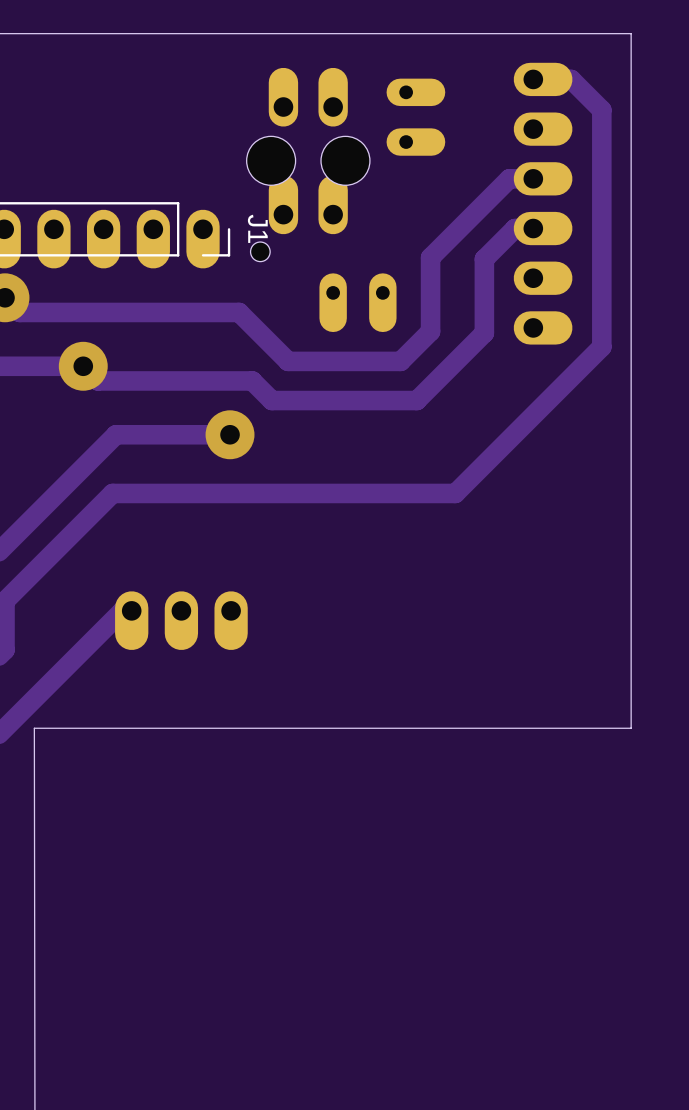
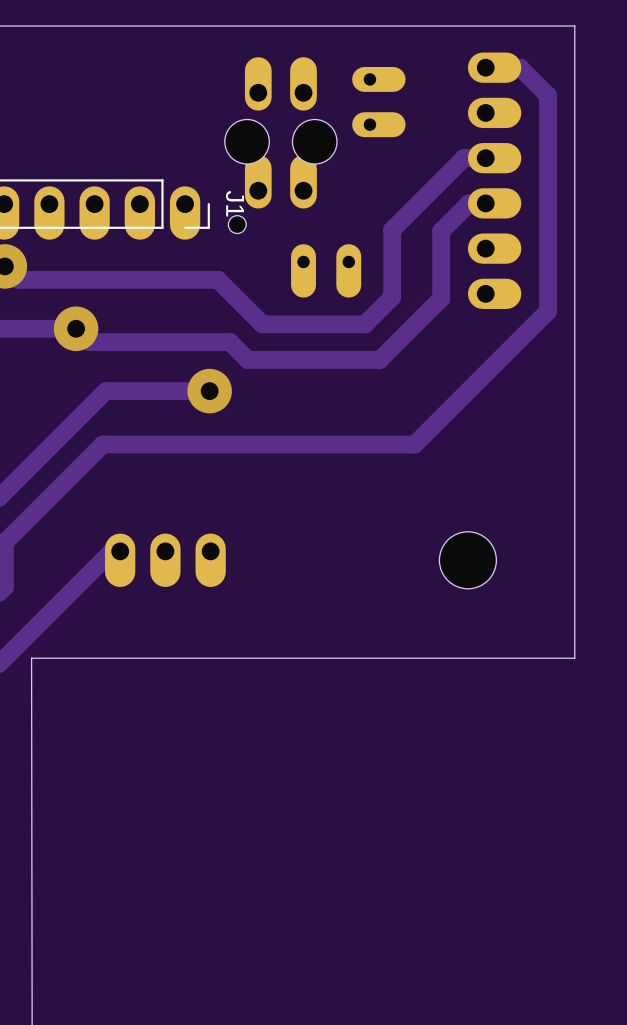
part: none -> (467, 560)

